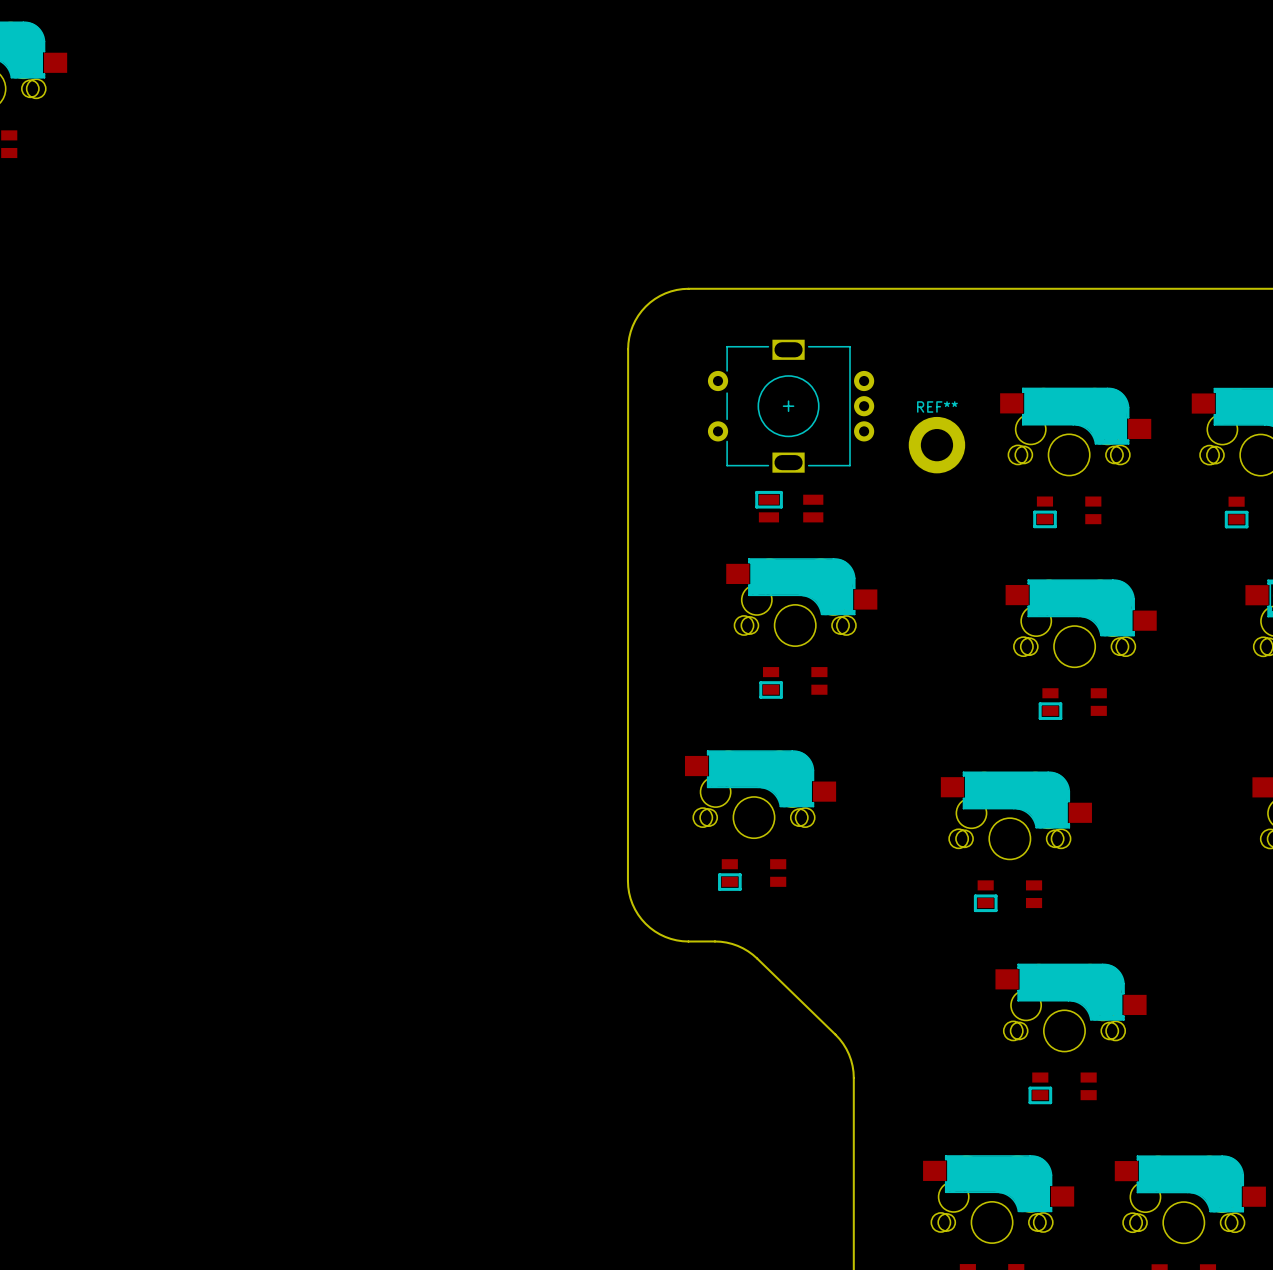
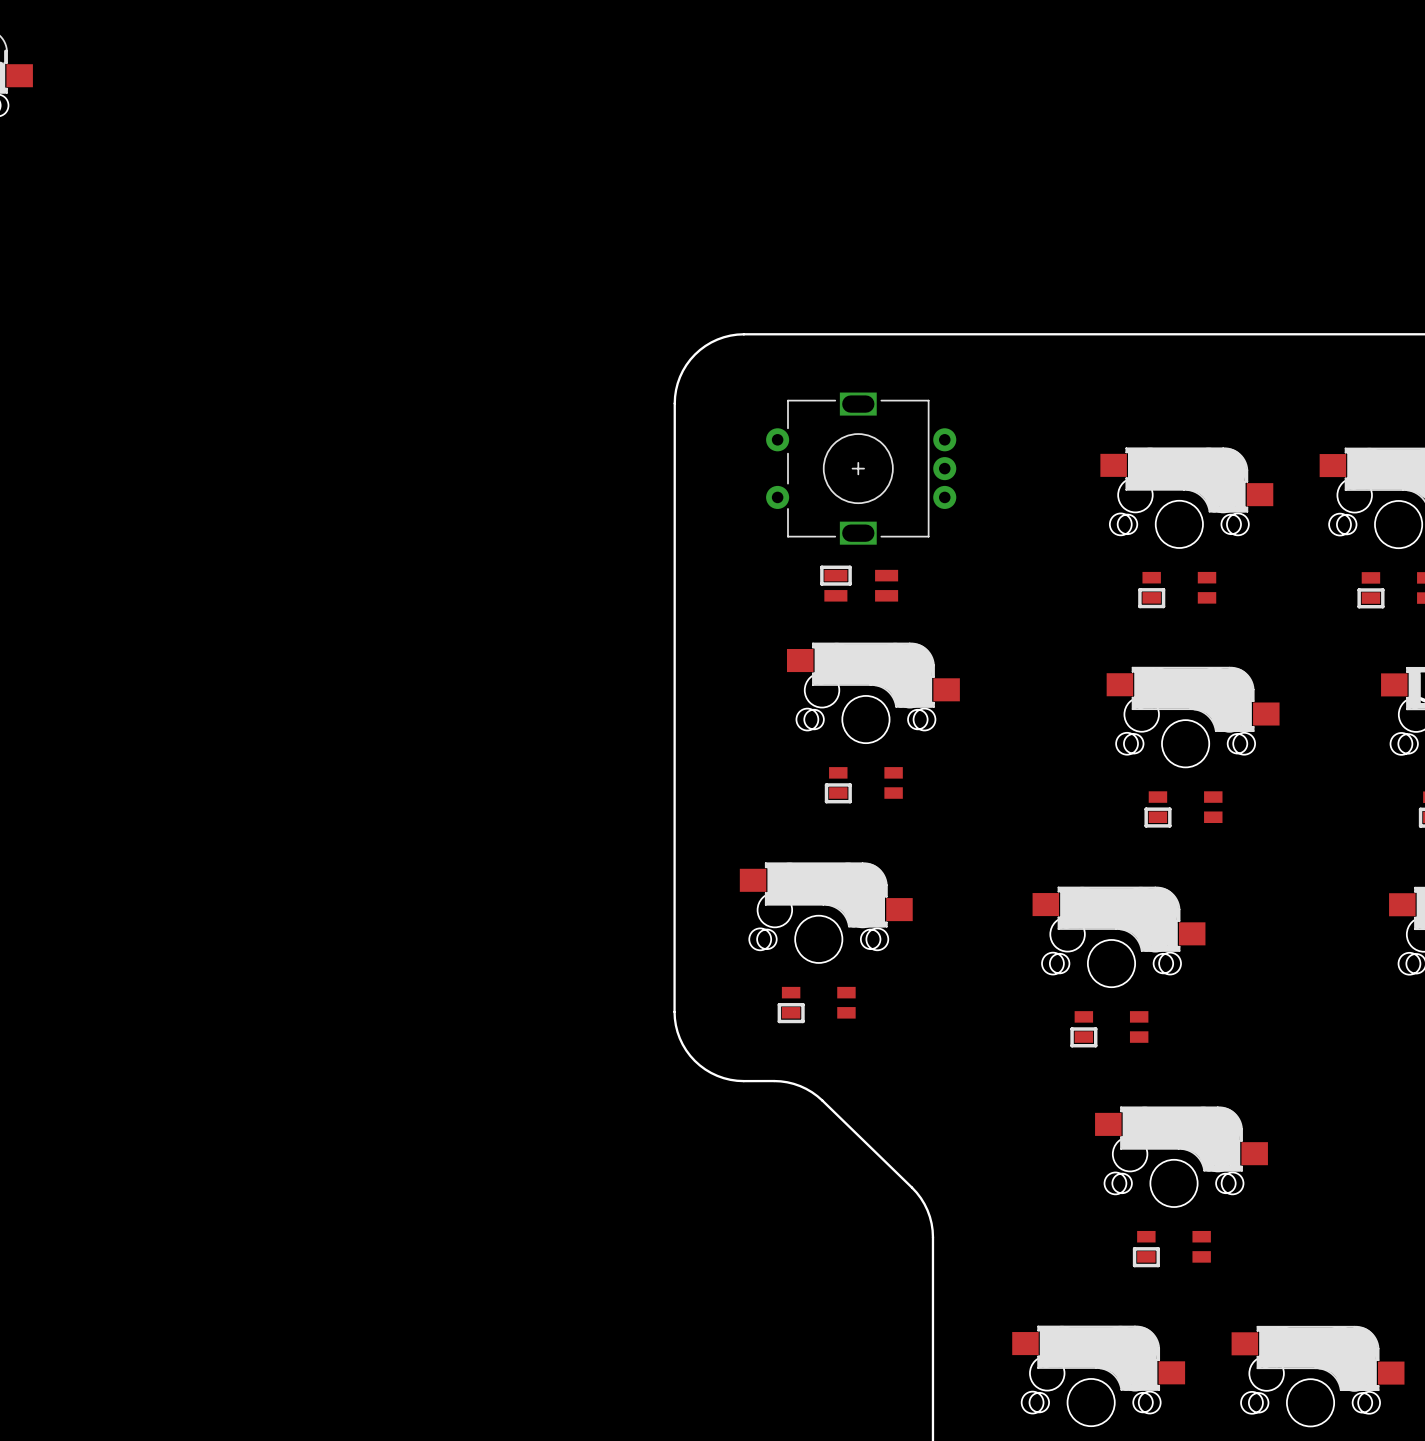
REF**: (936, 445) -> none

